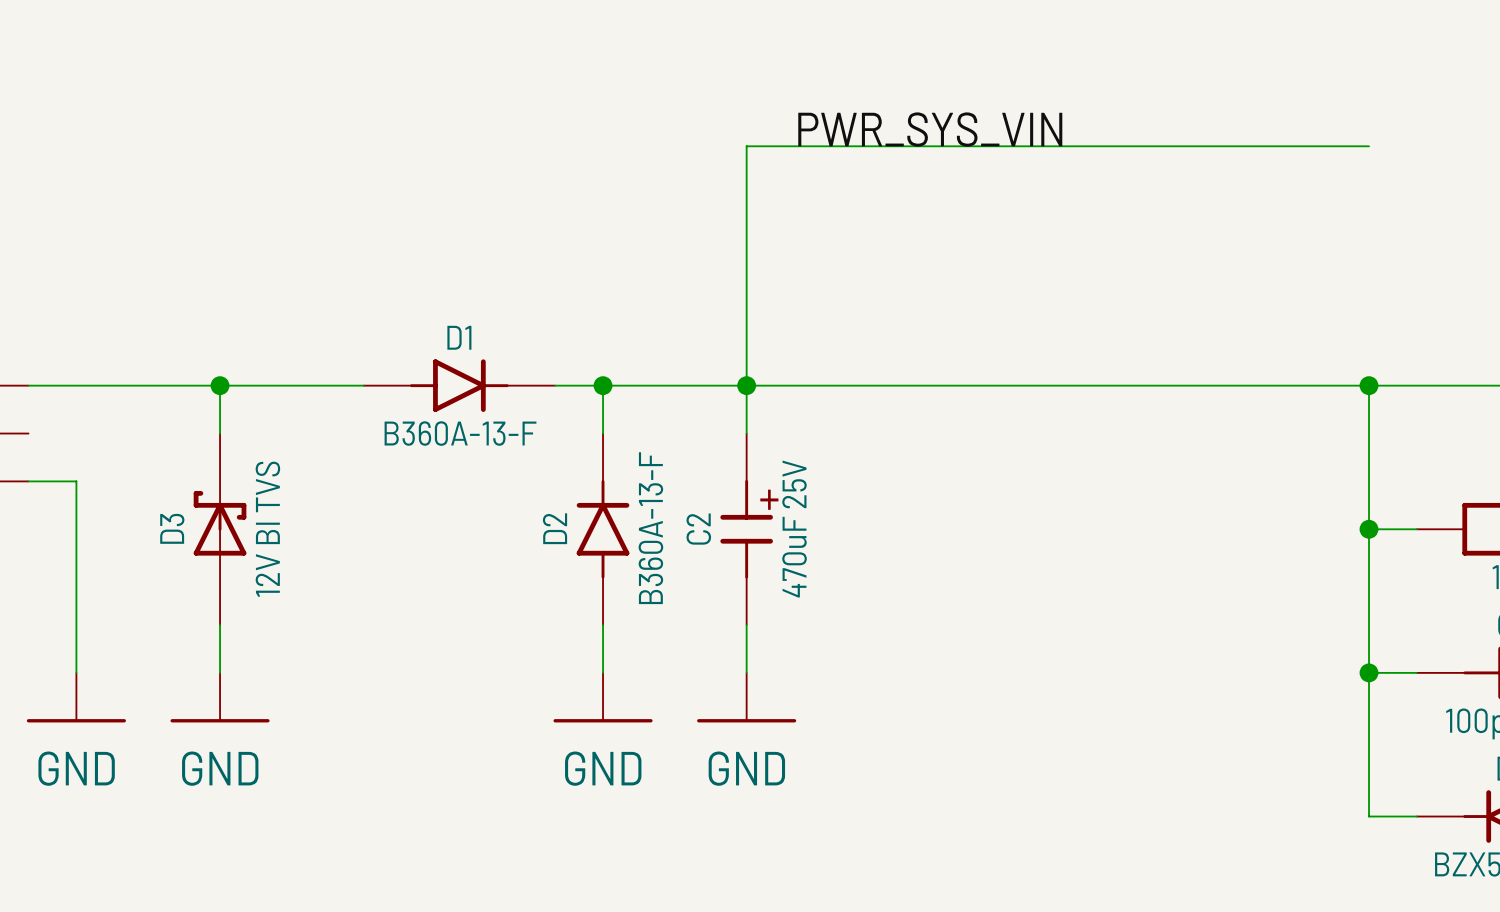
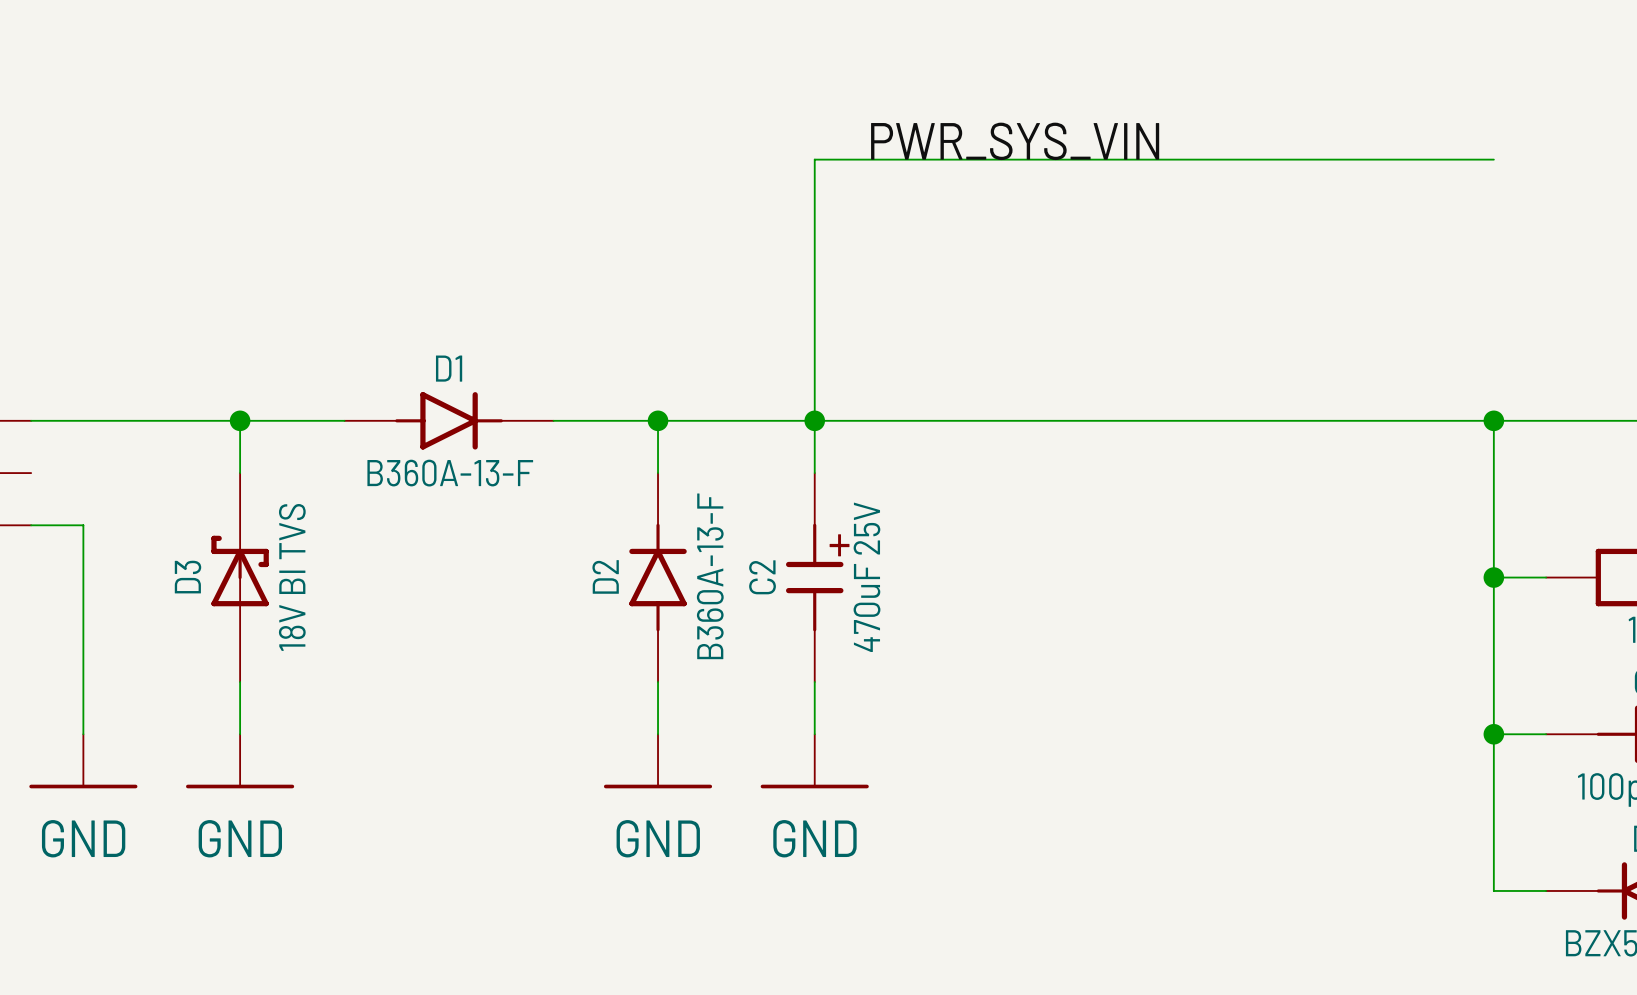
D1 position: (459, 385) -> (449, 420)
D3 value: 12V BI TVS (267, 529) -> 18V BI TVS (292, 577)

